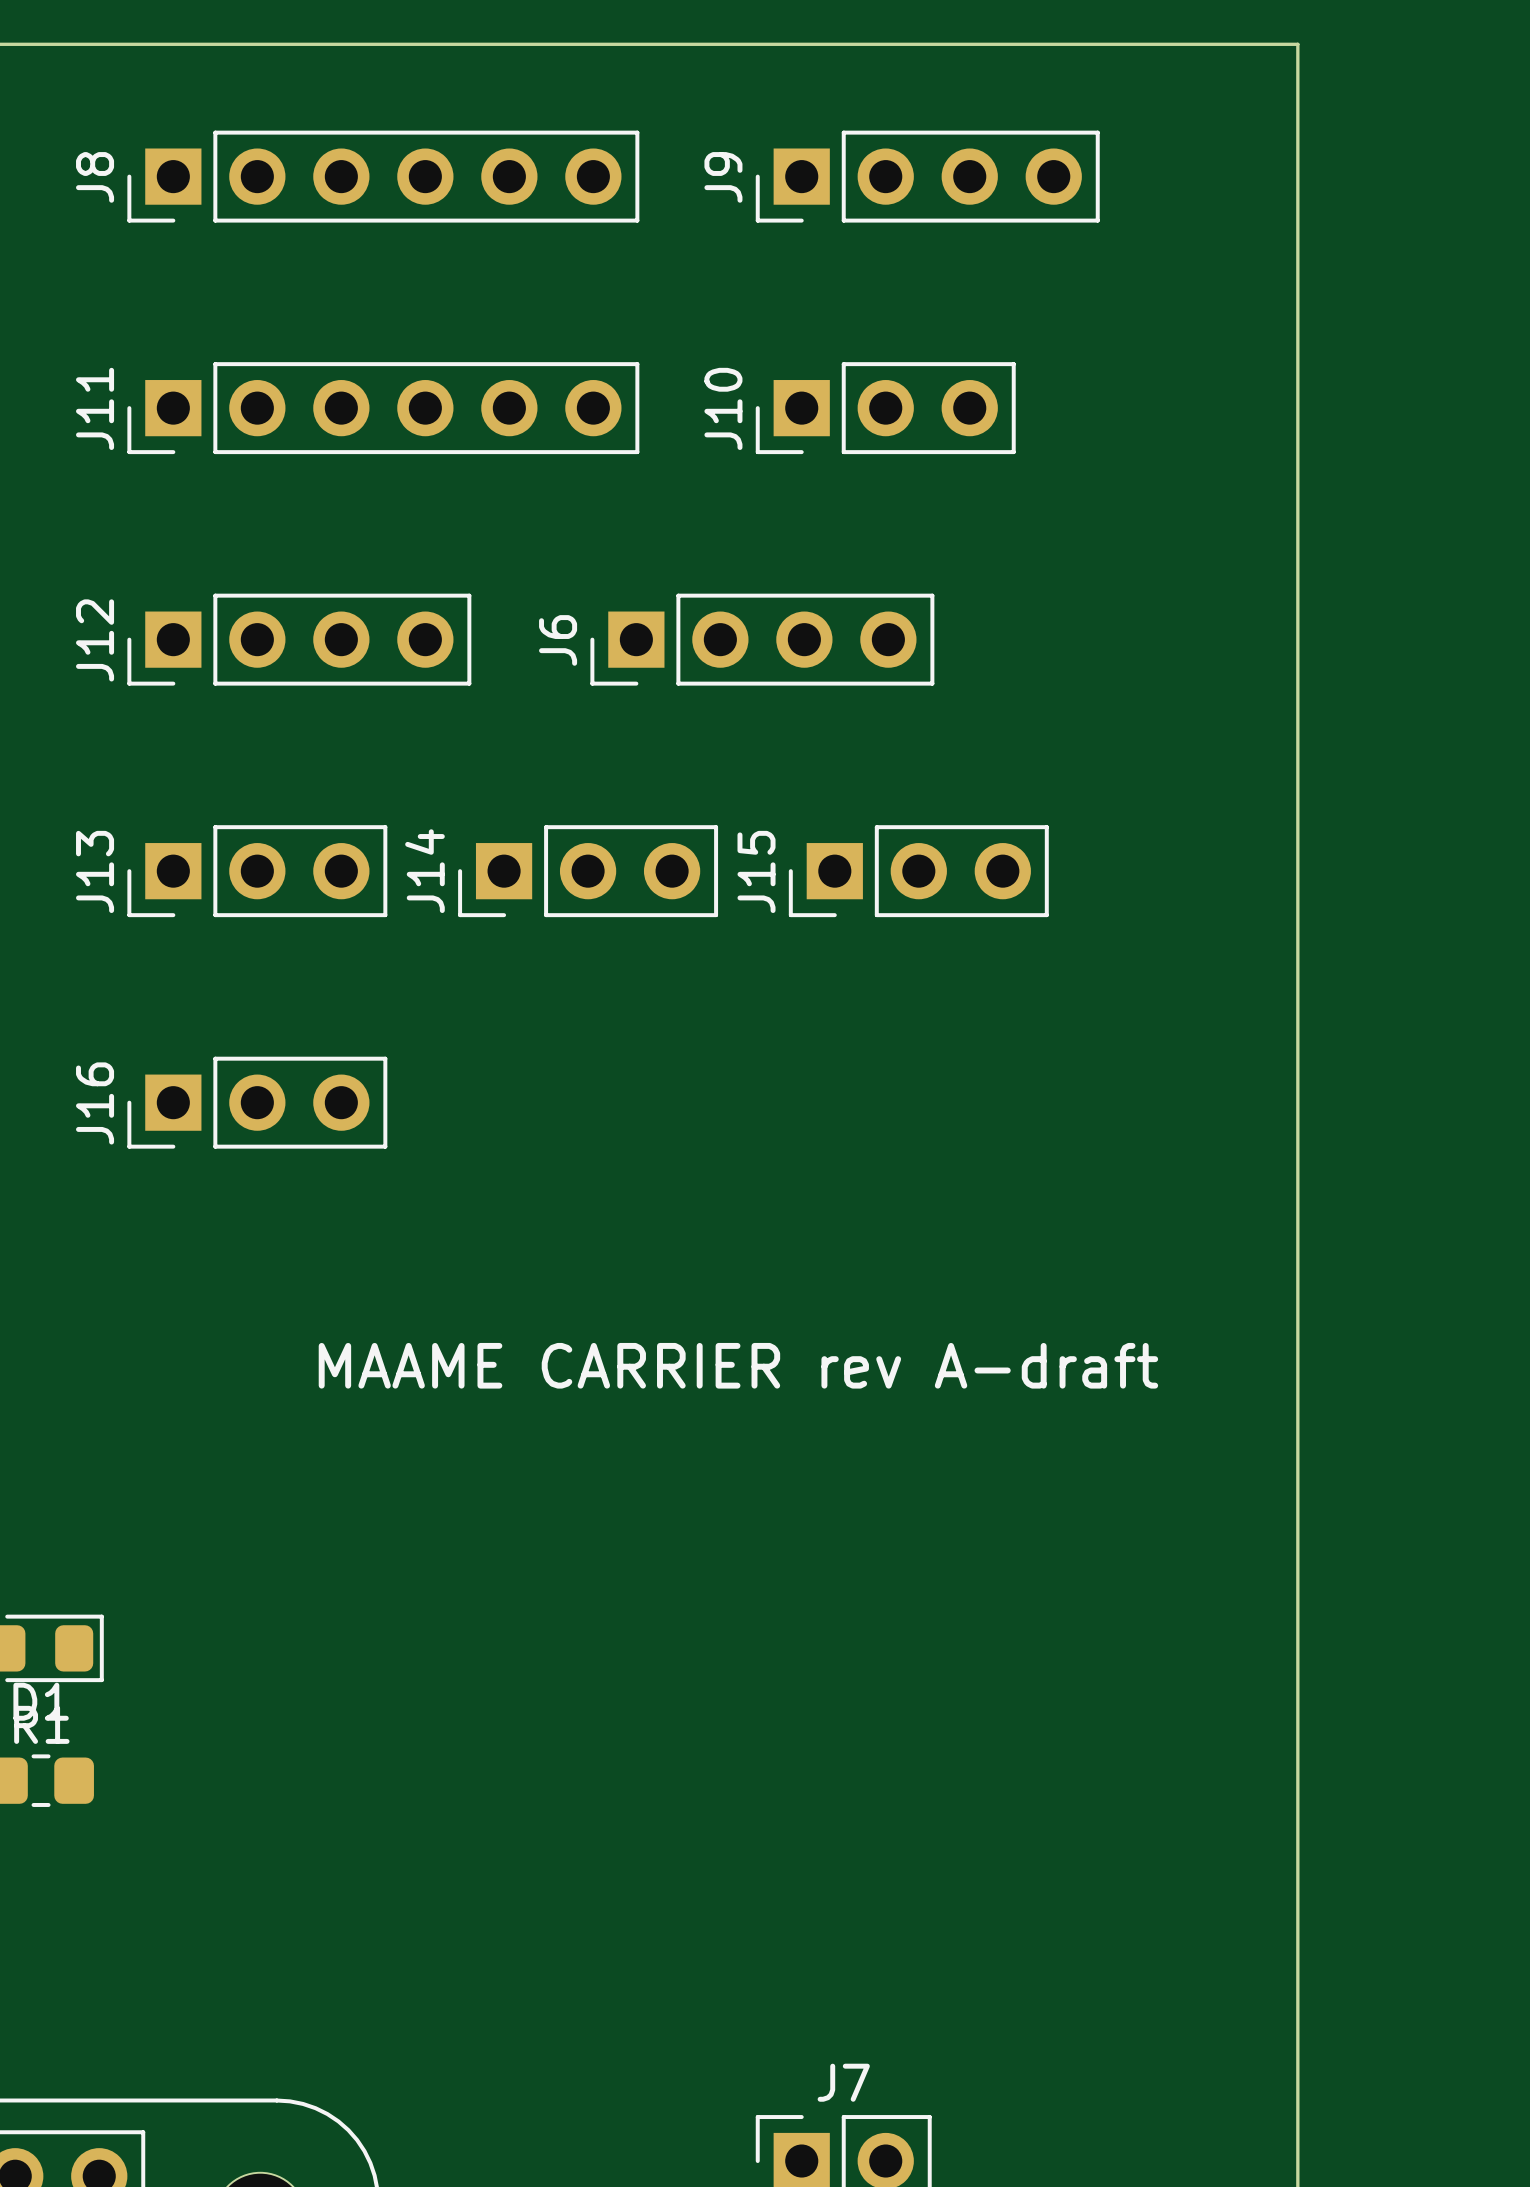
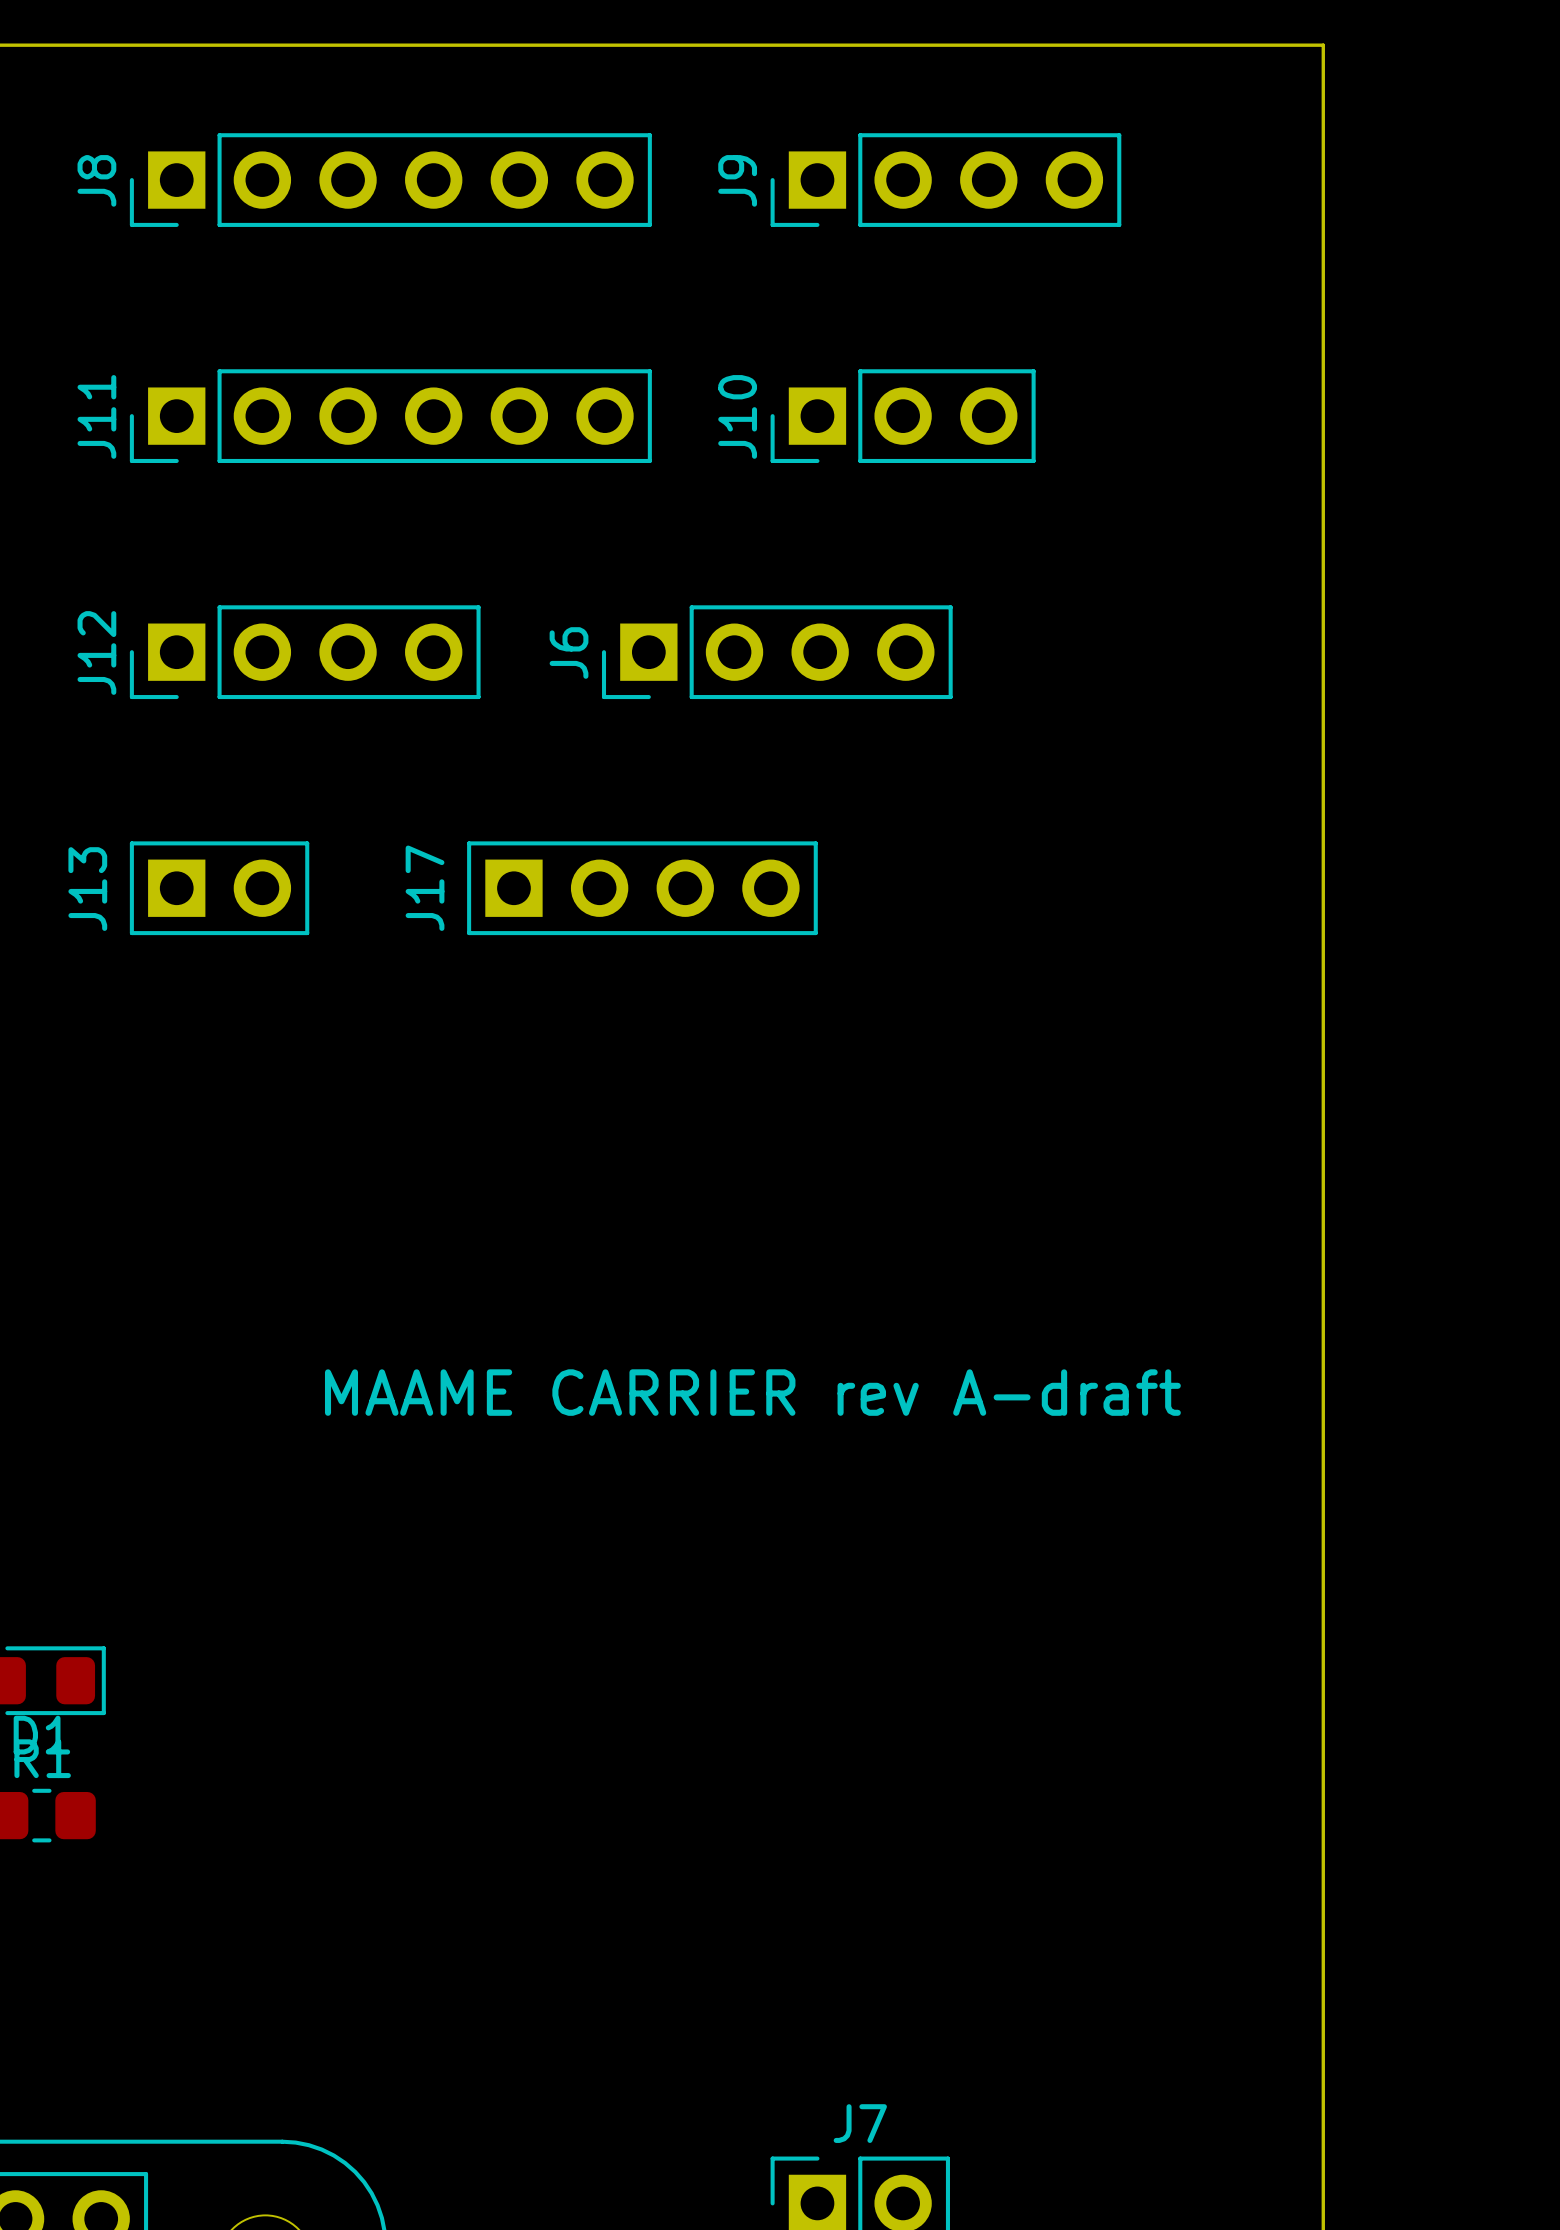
J13 footprint: [127, 825, 388, 918] -> [129, 841, 310, 936]
J14: (588, 871) -> none
J17: none -> (642, 888)
J15: (918, 871) -> none
J16: (257, 1102) -> none

